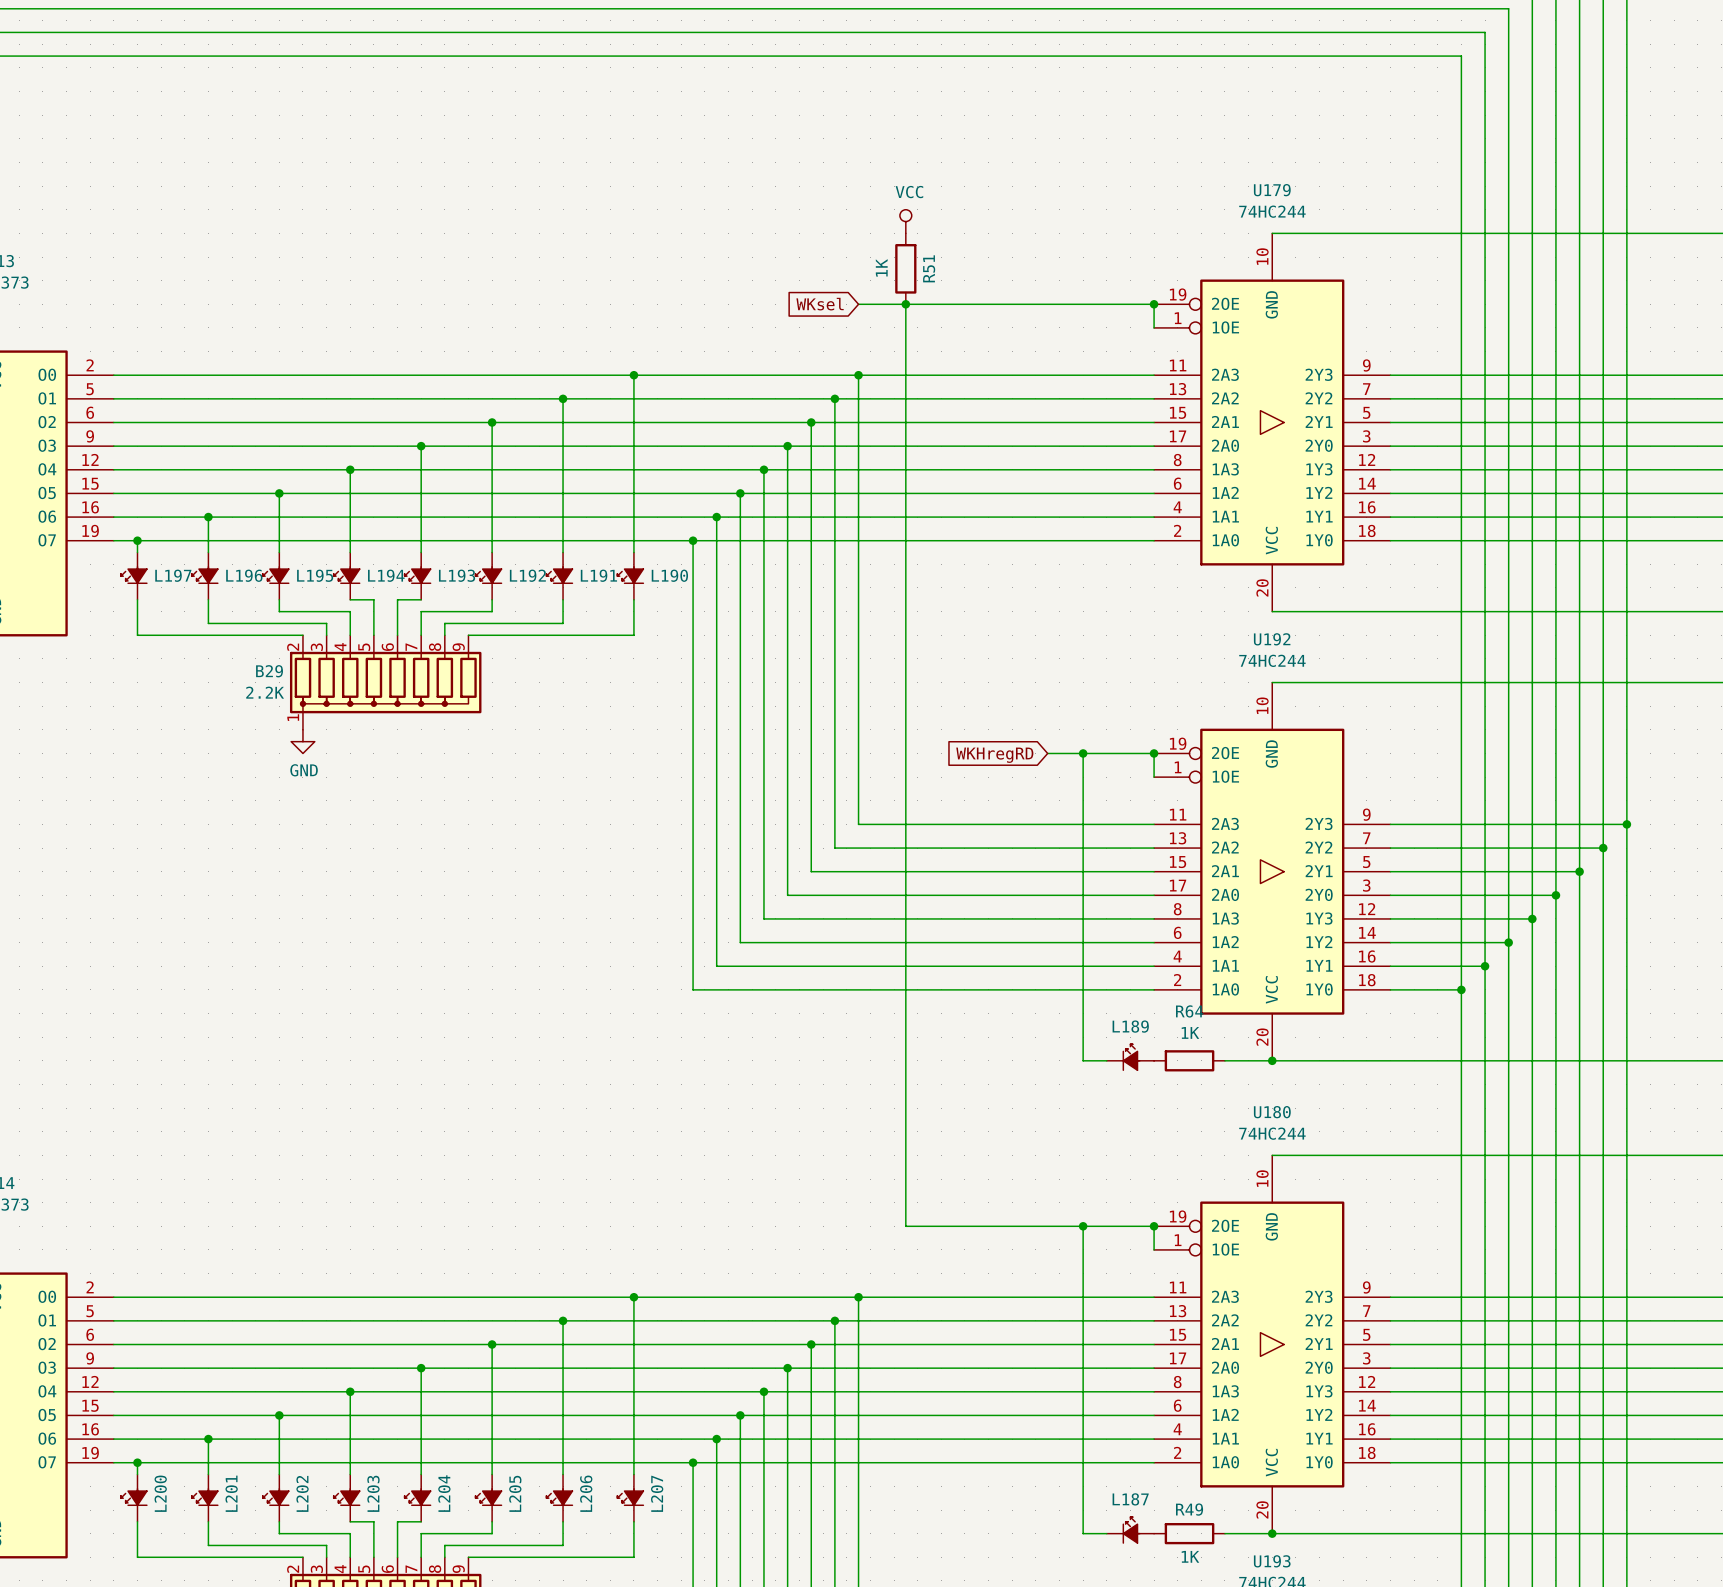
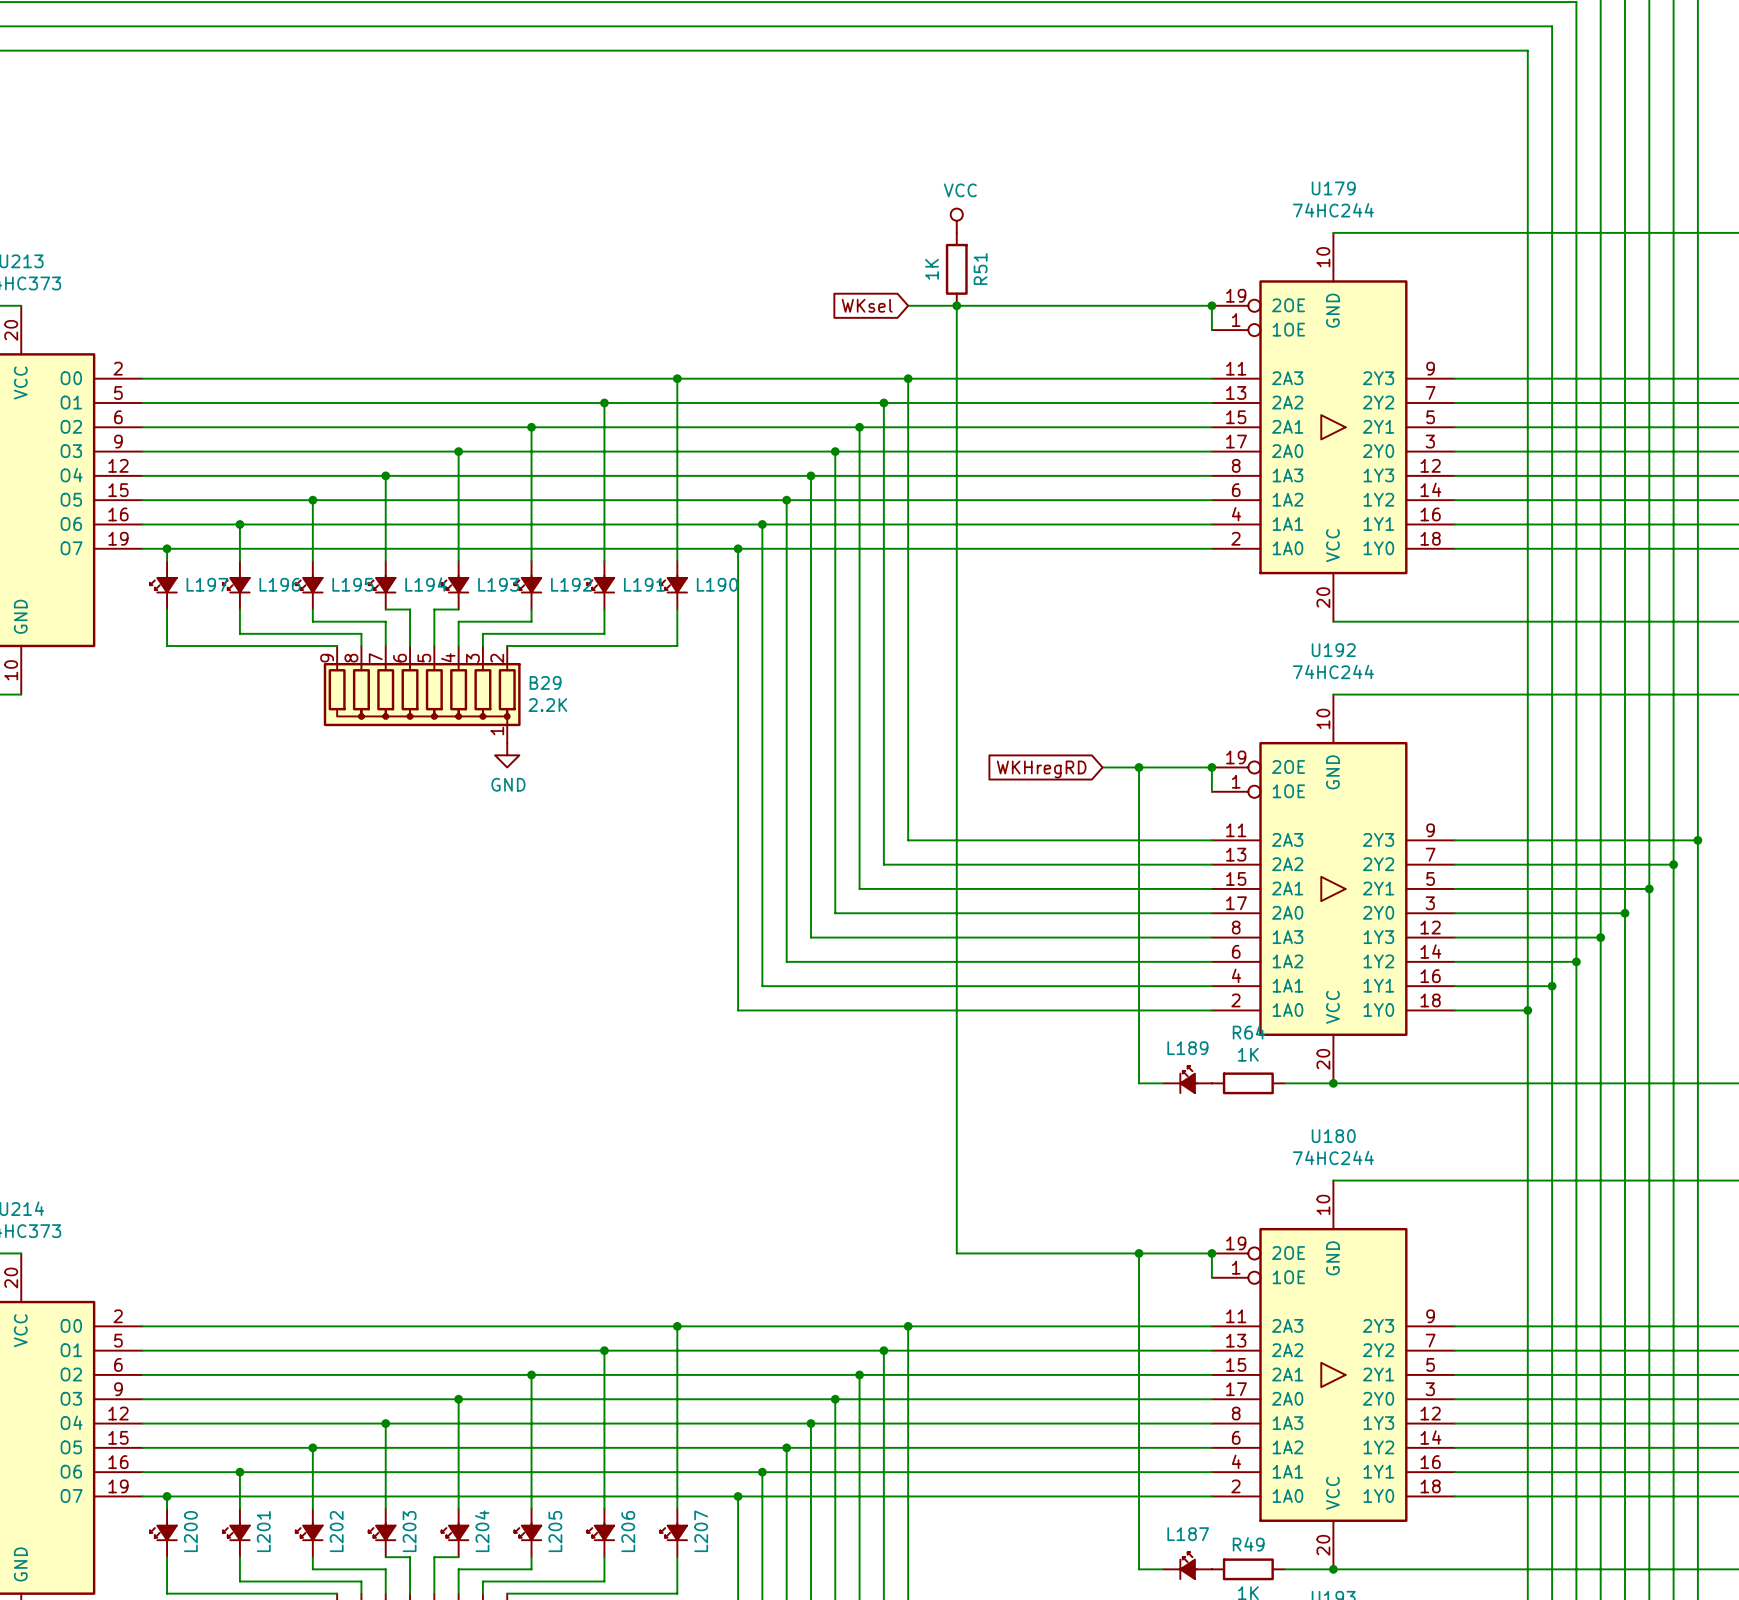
B29 flip: as is (385, 682) -> left-right (422, 694)
power symbol position: GND (302, 741) -> GND (507, 755)

